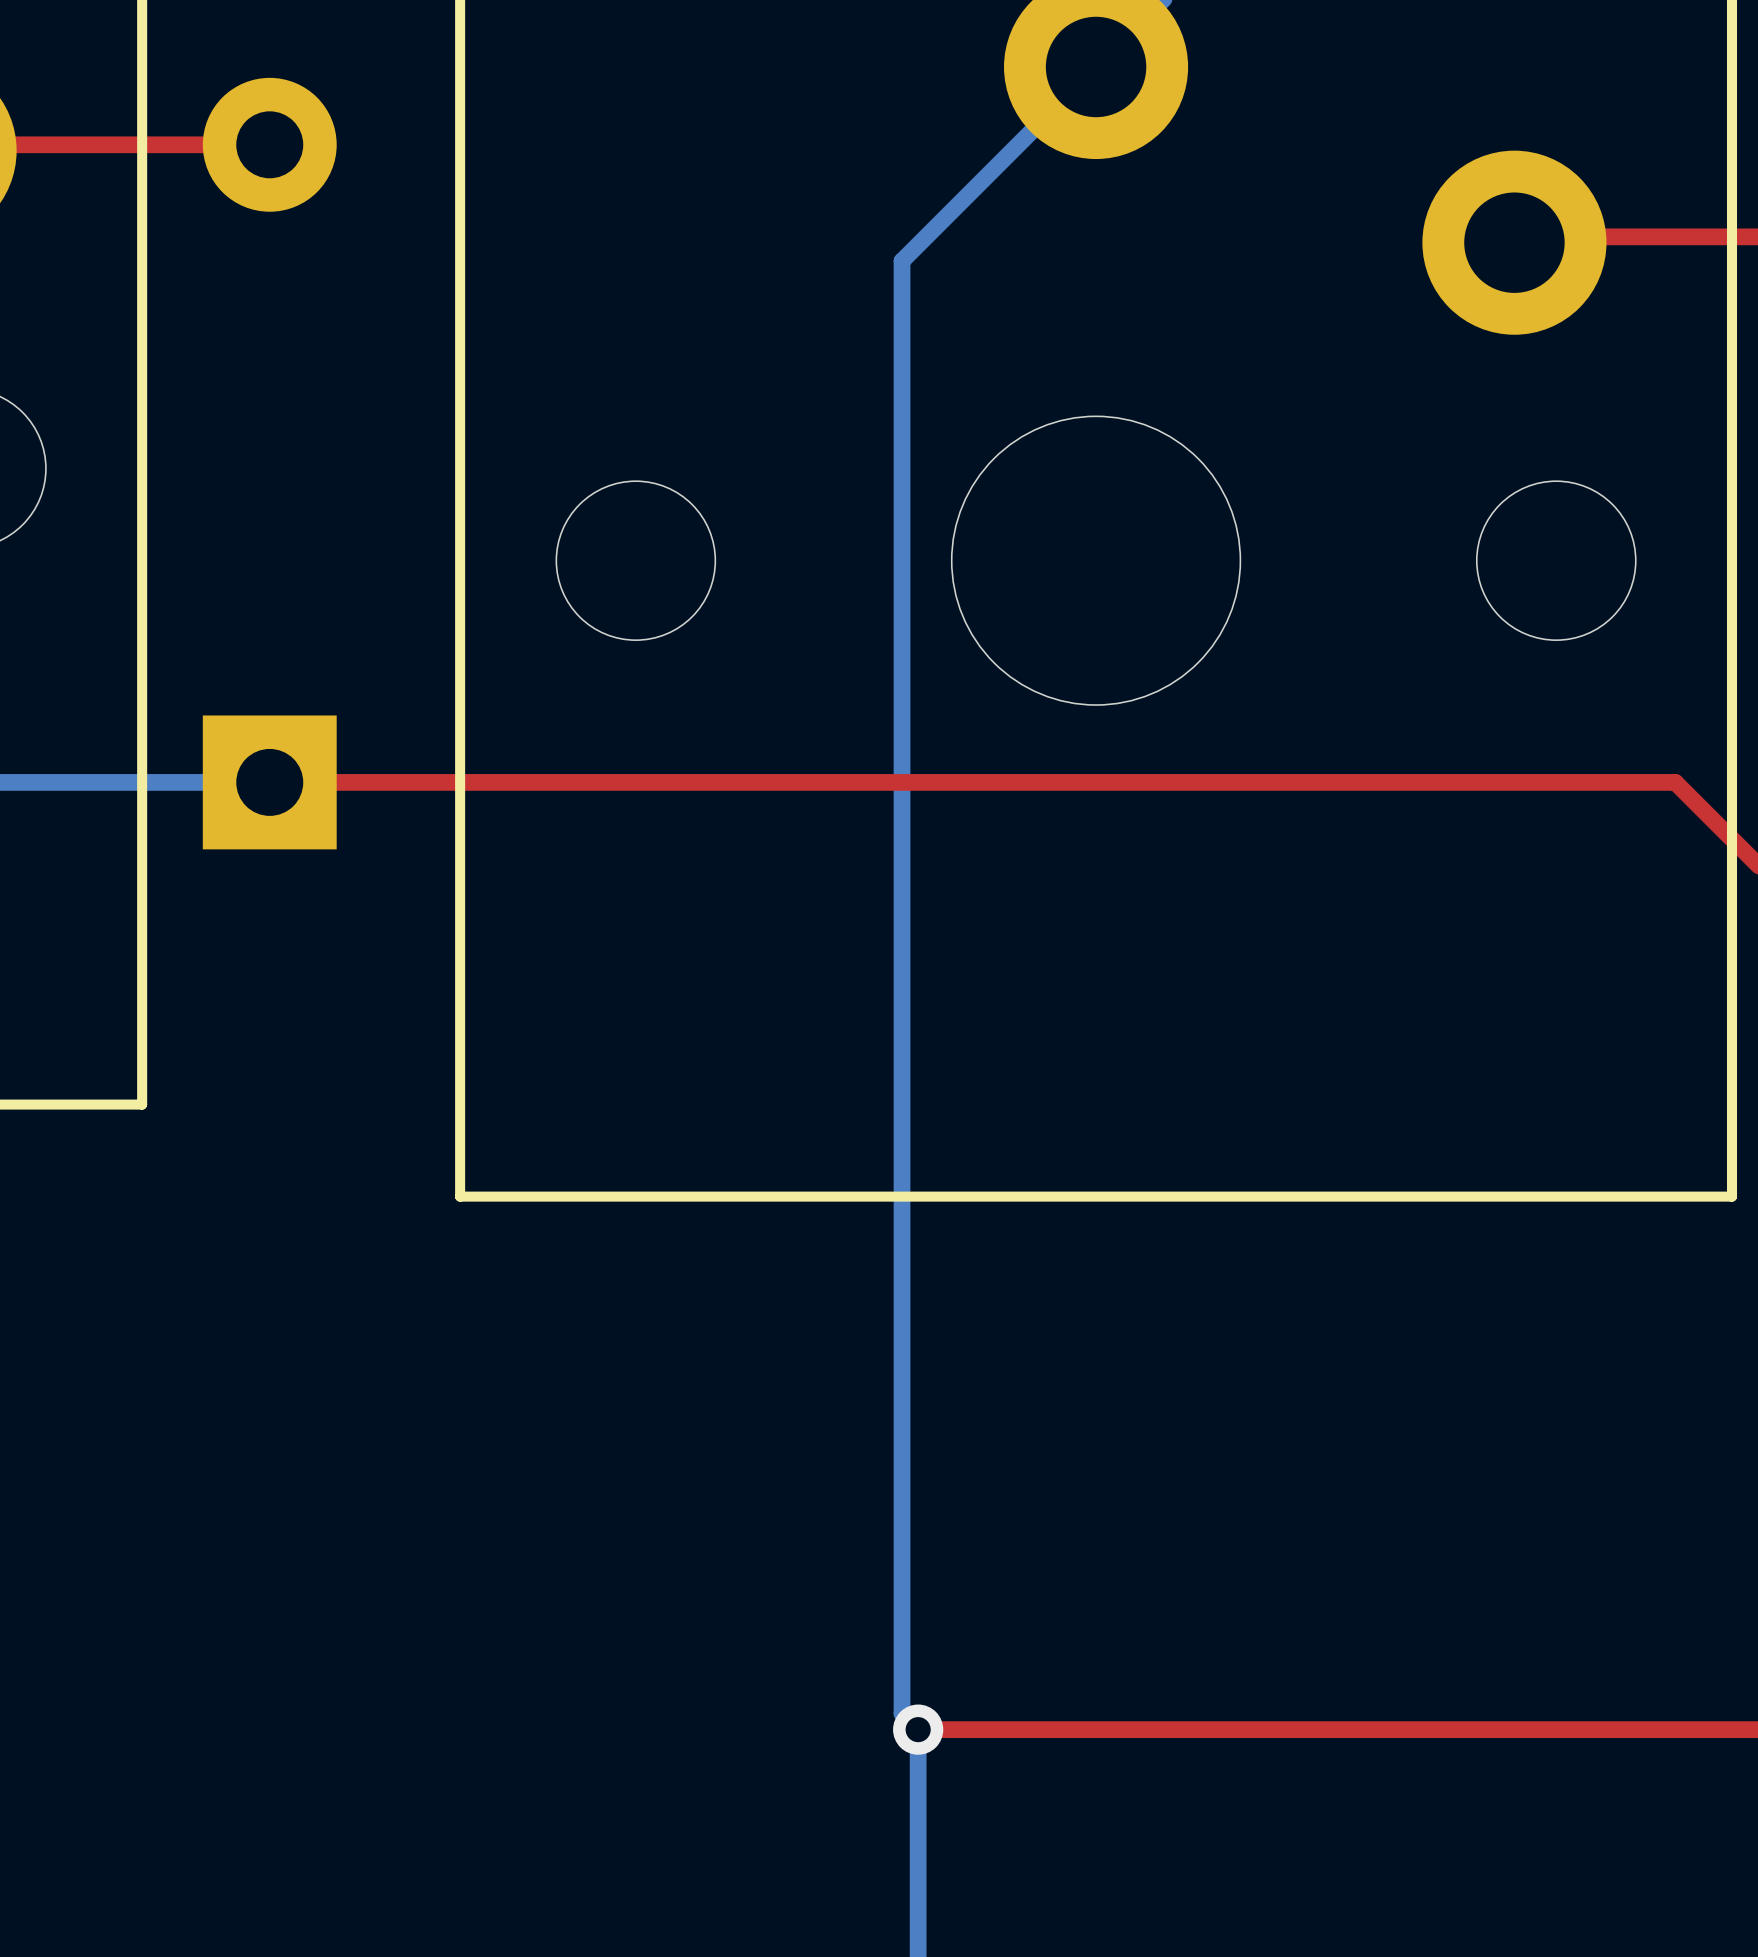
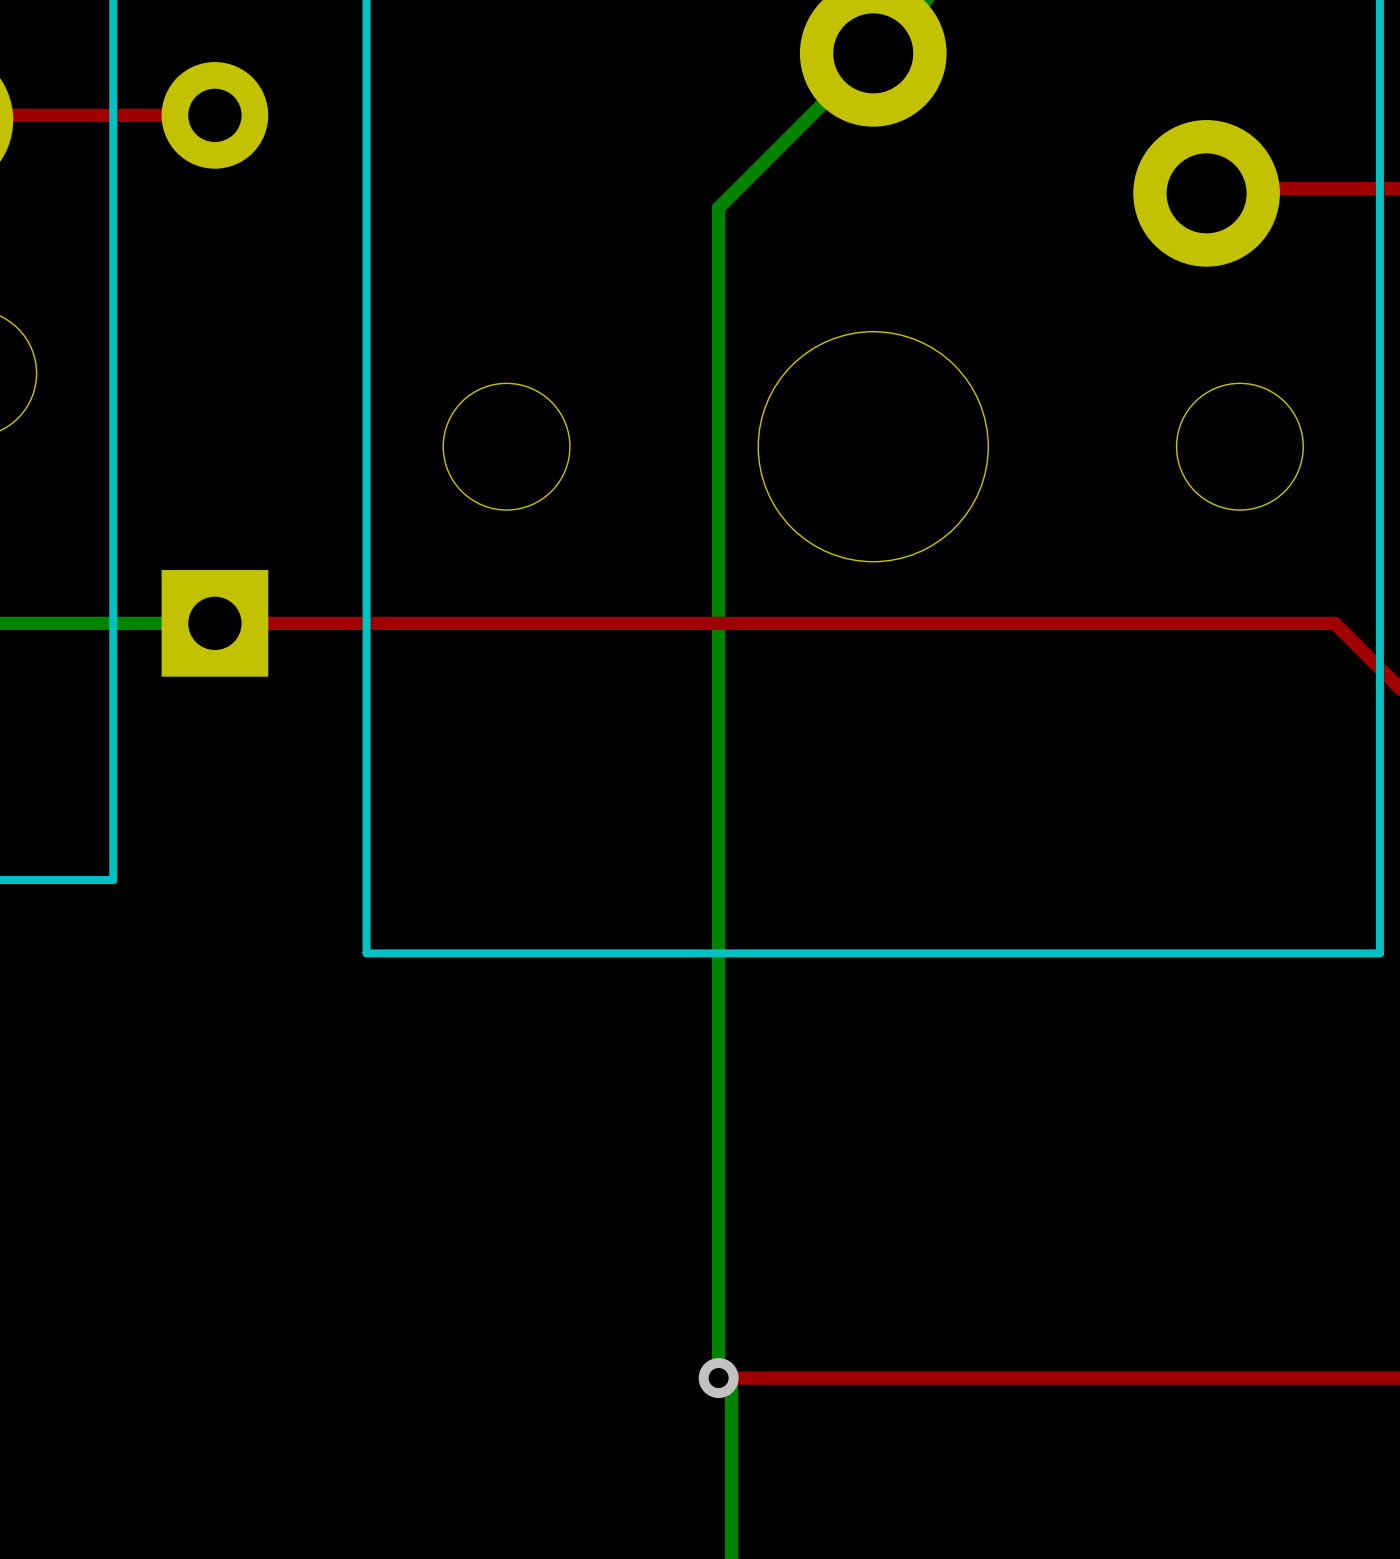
via position: (918, 1729) -> (718, 1378)

